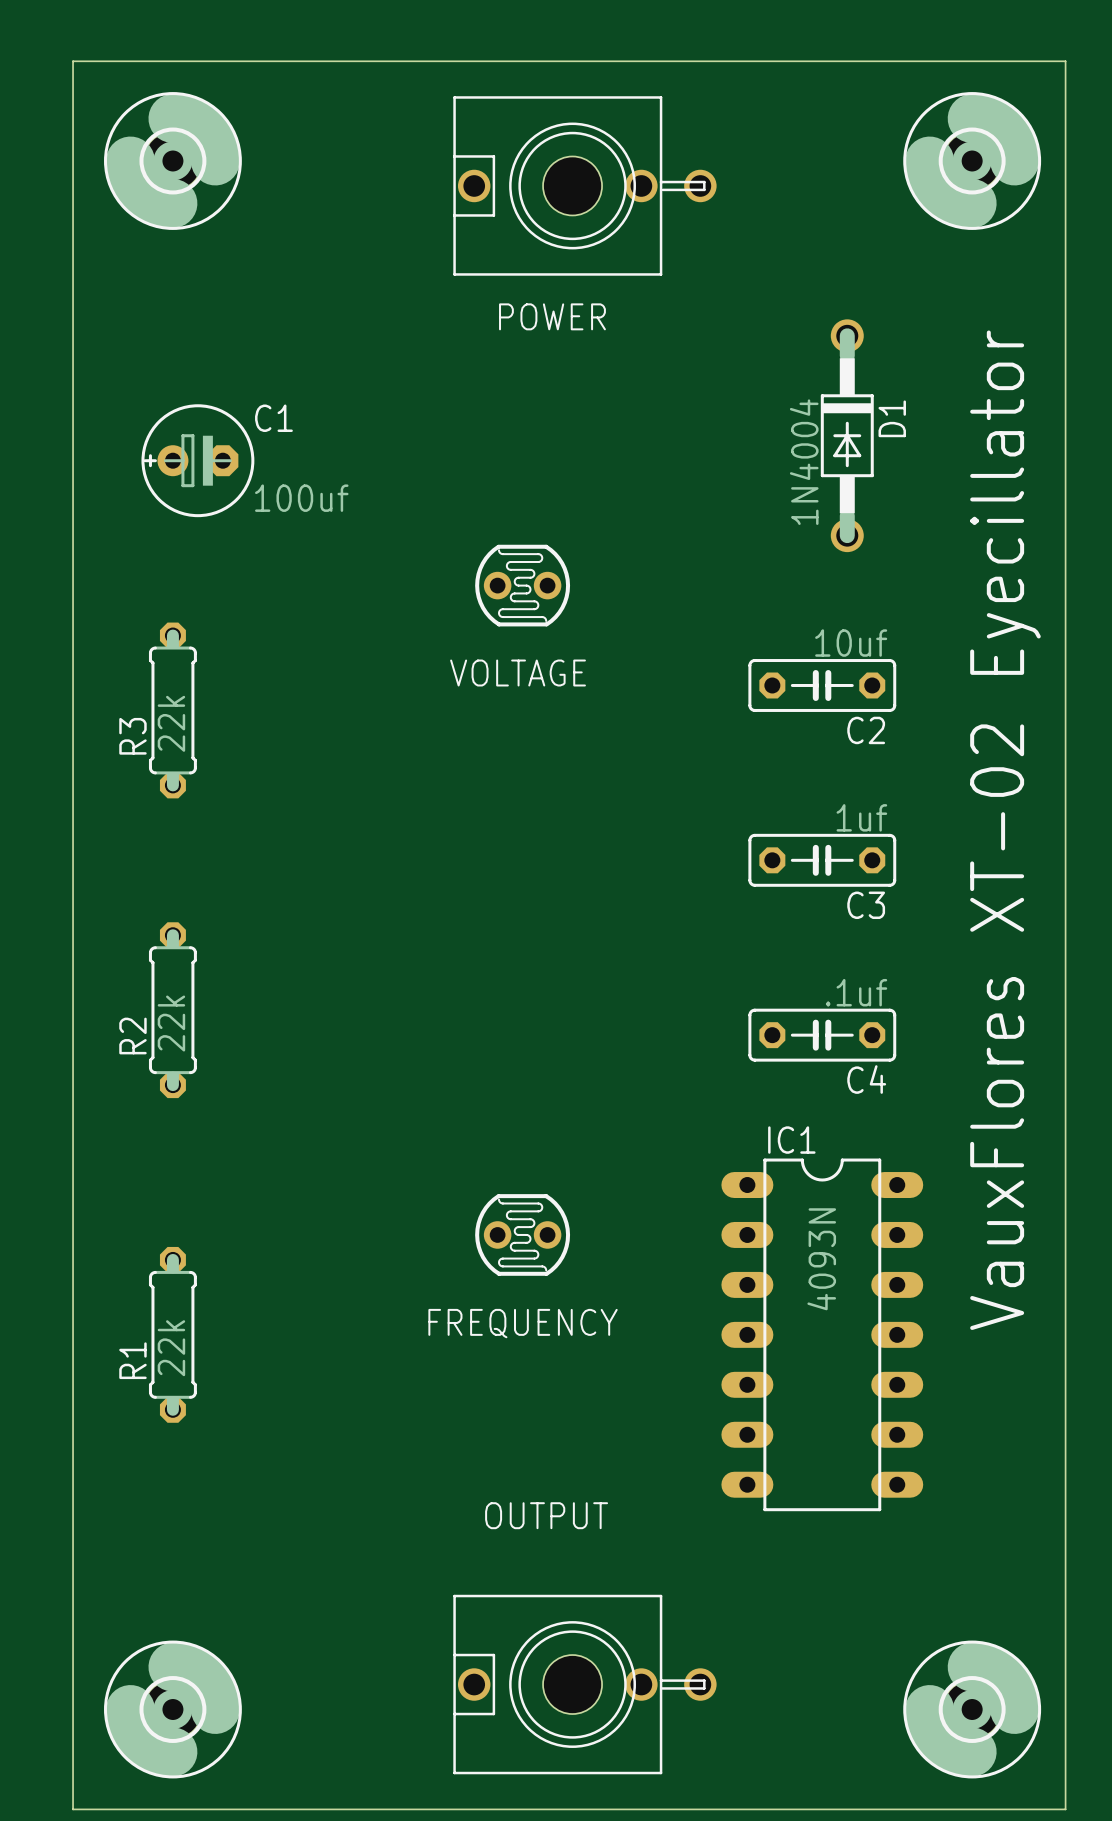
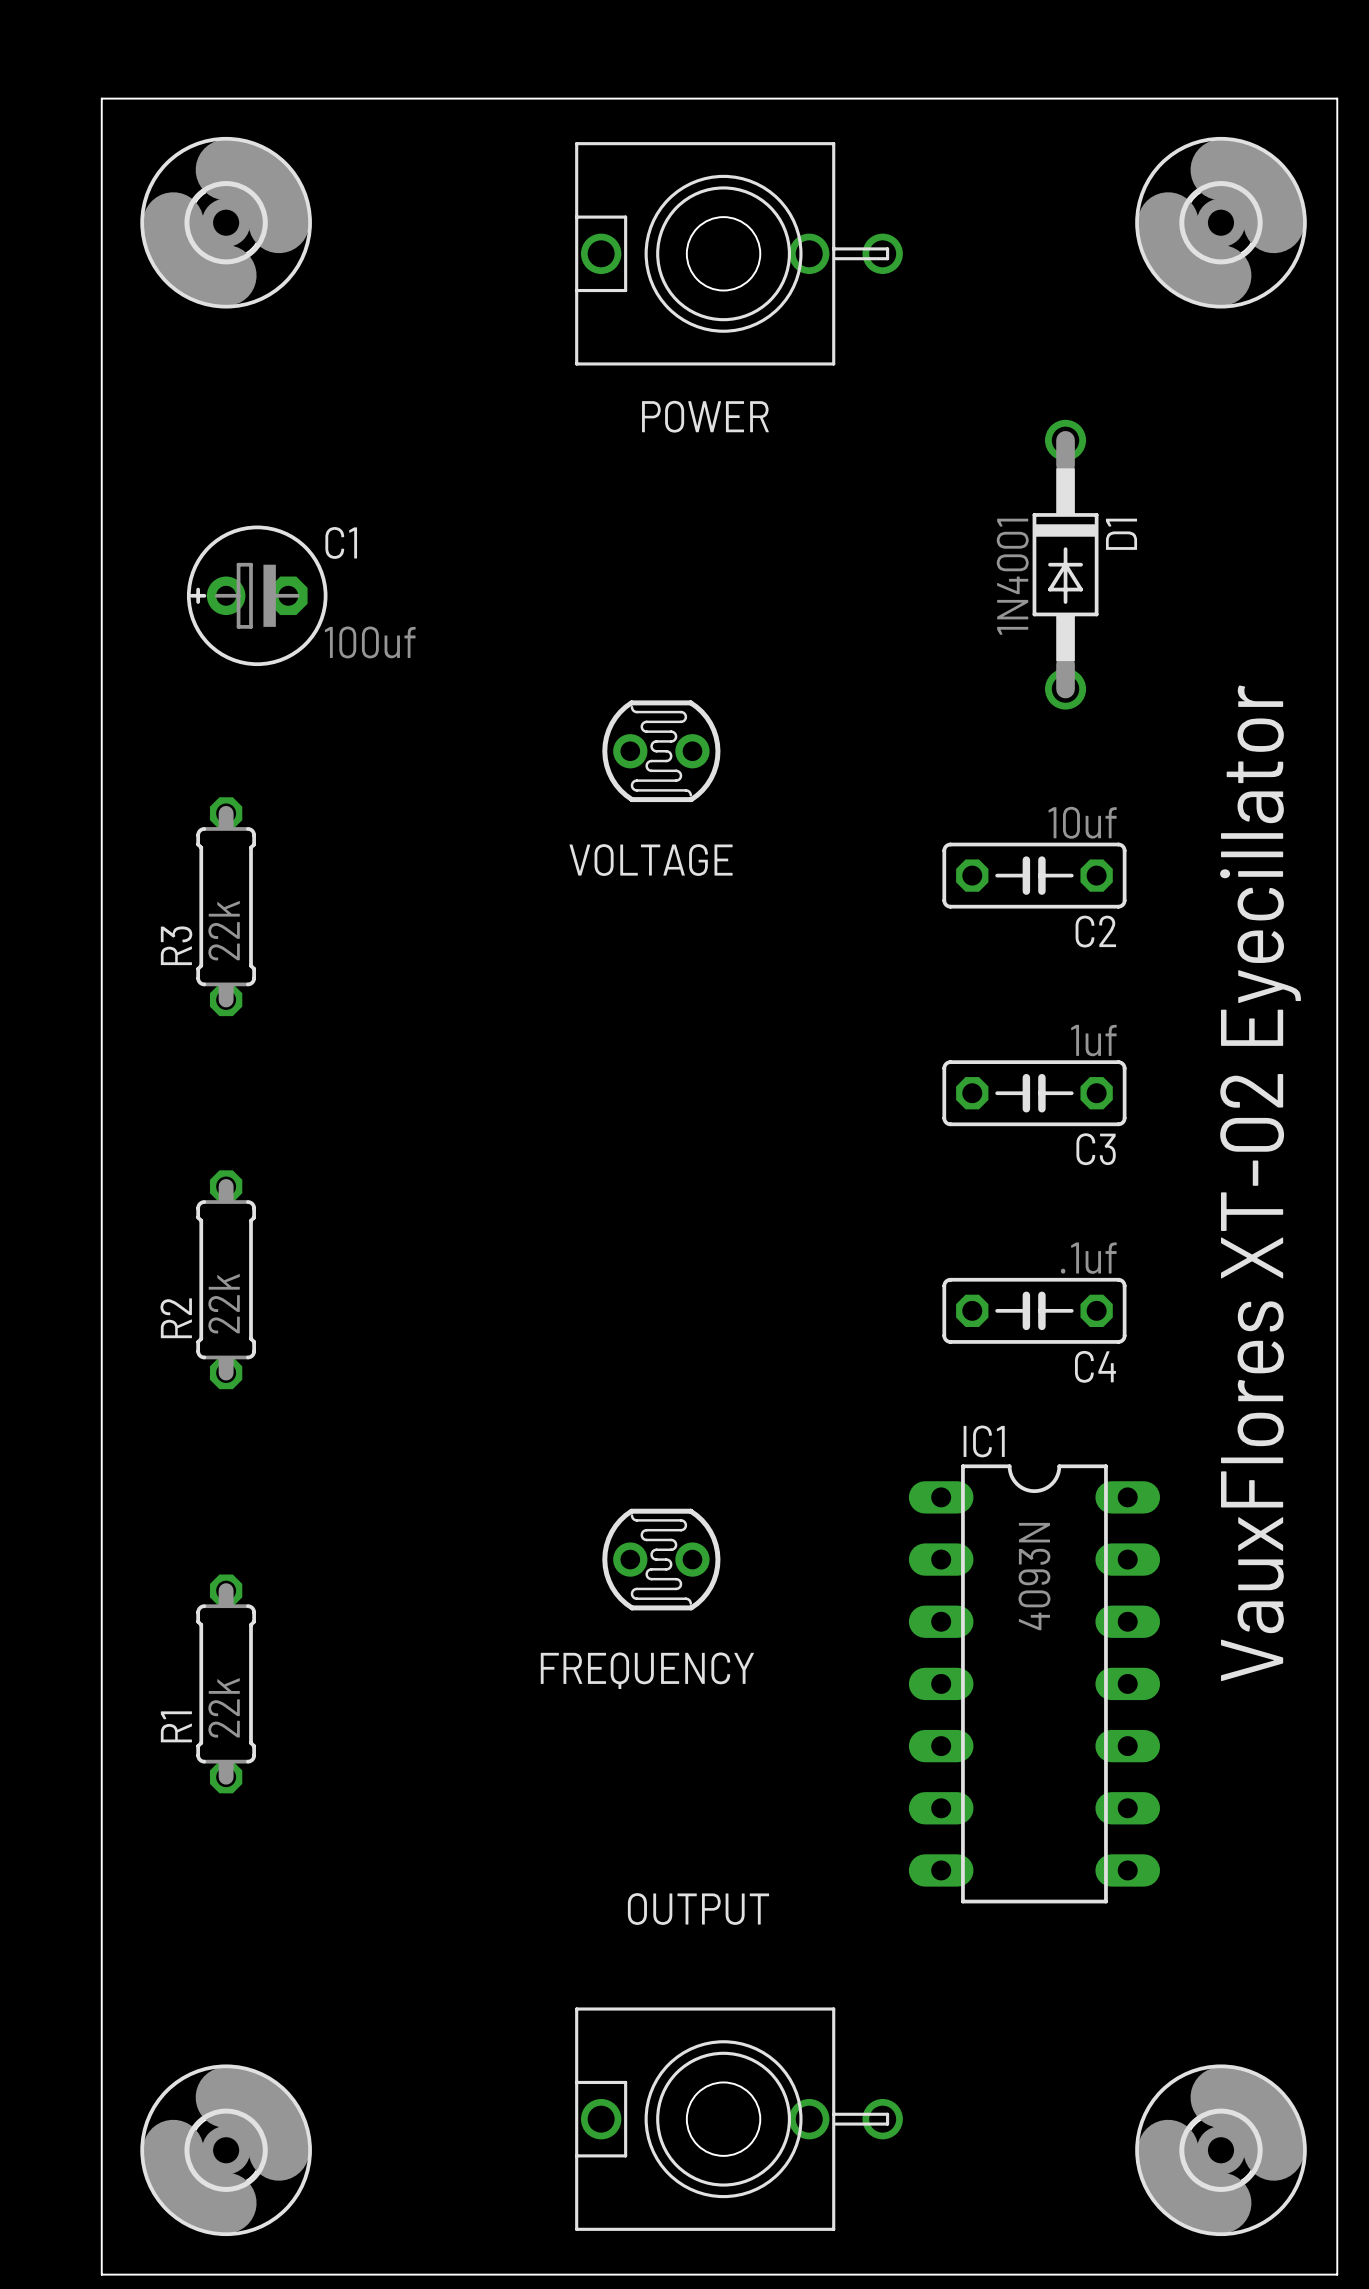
D1 value: 1N4004 (804, 462) -> 1N4001 (1012, 576)

